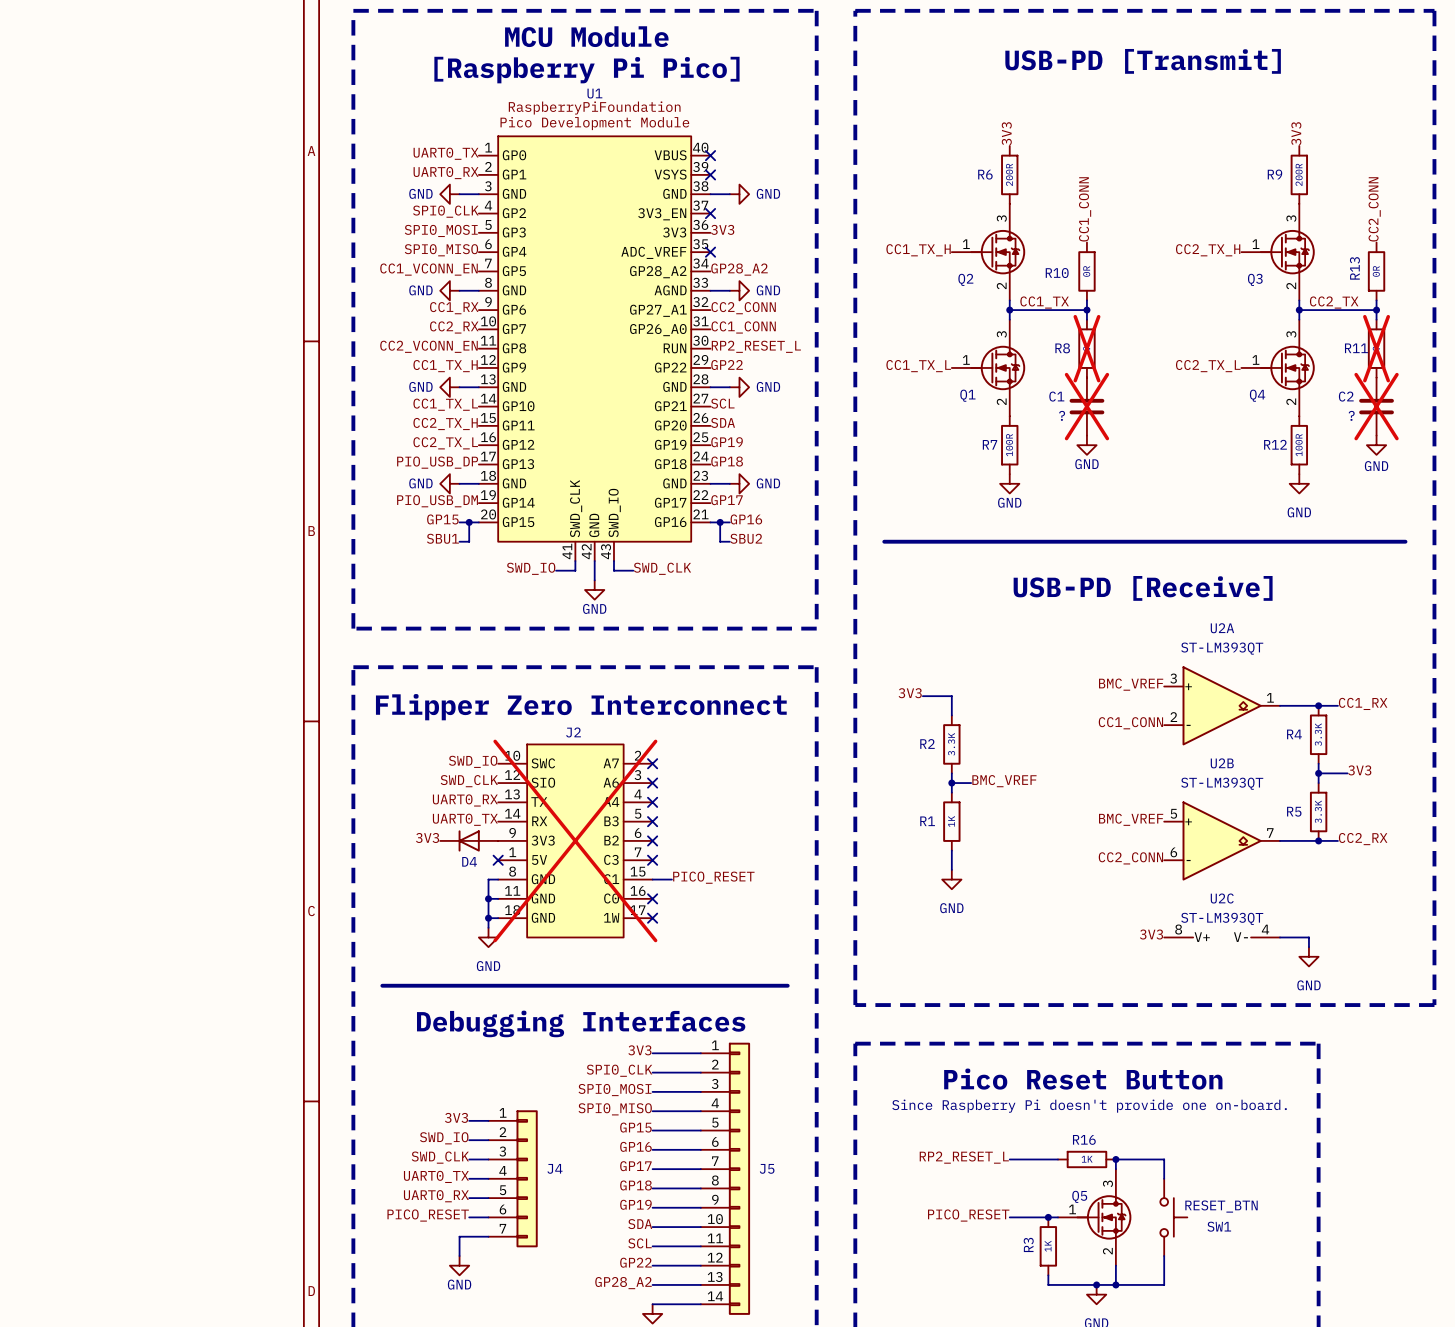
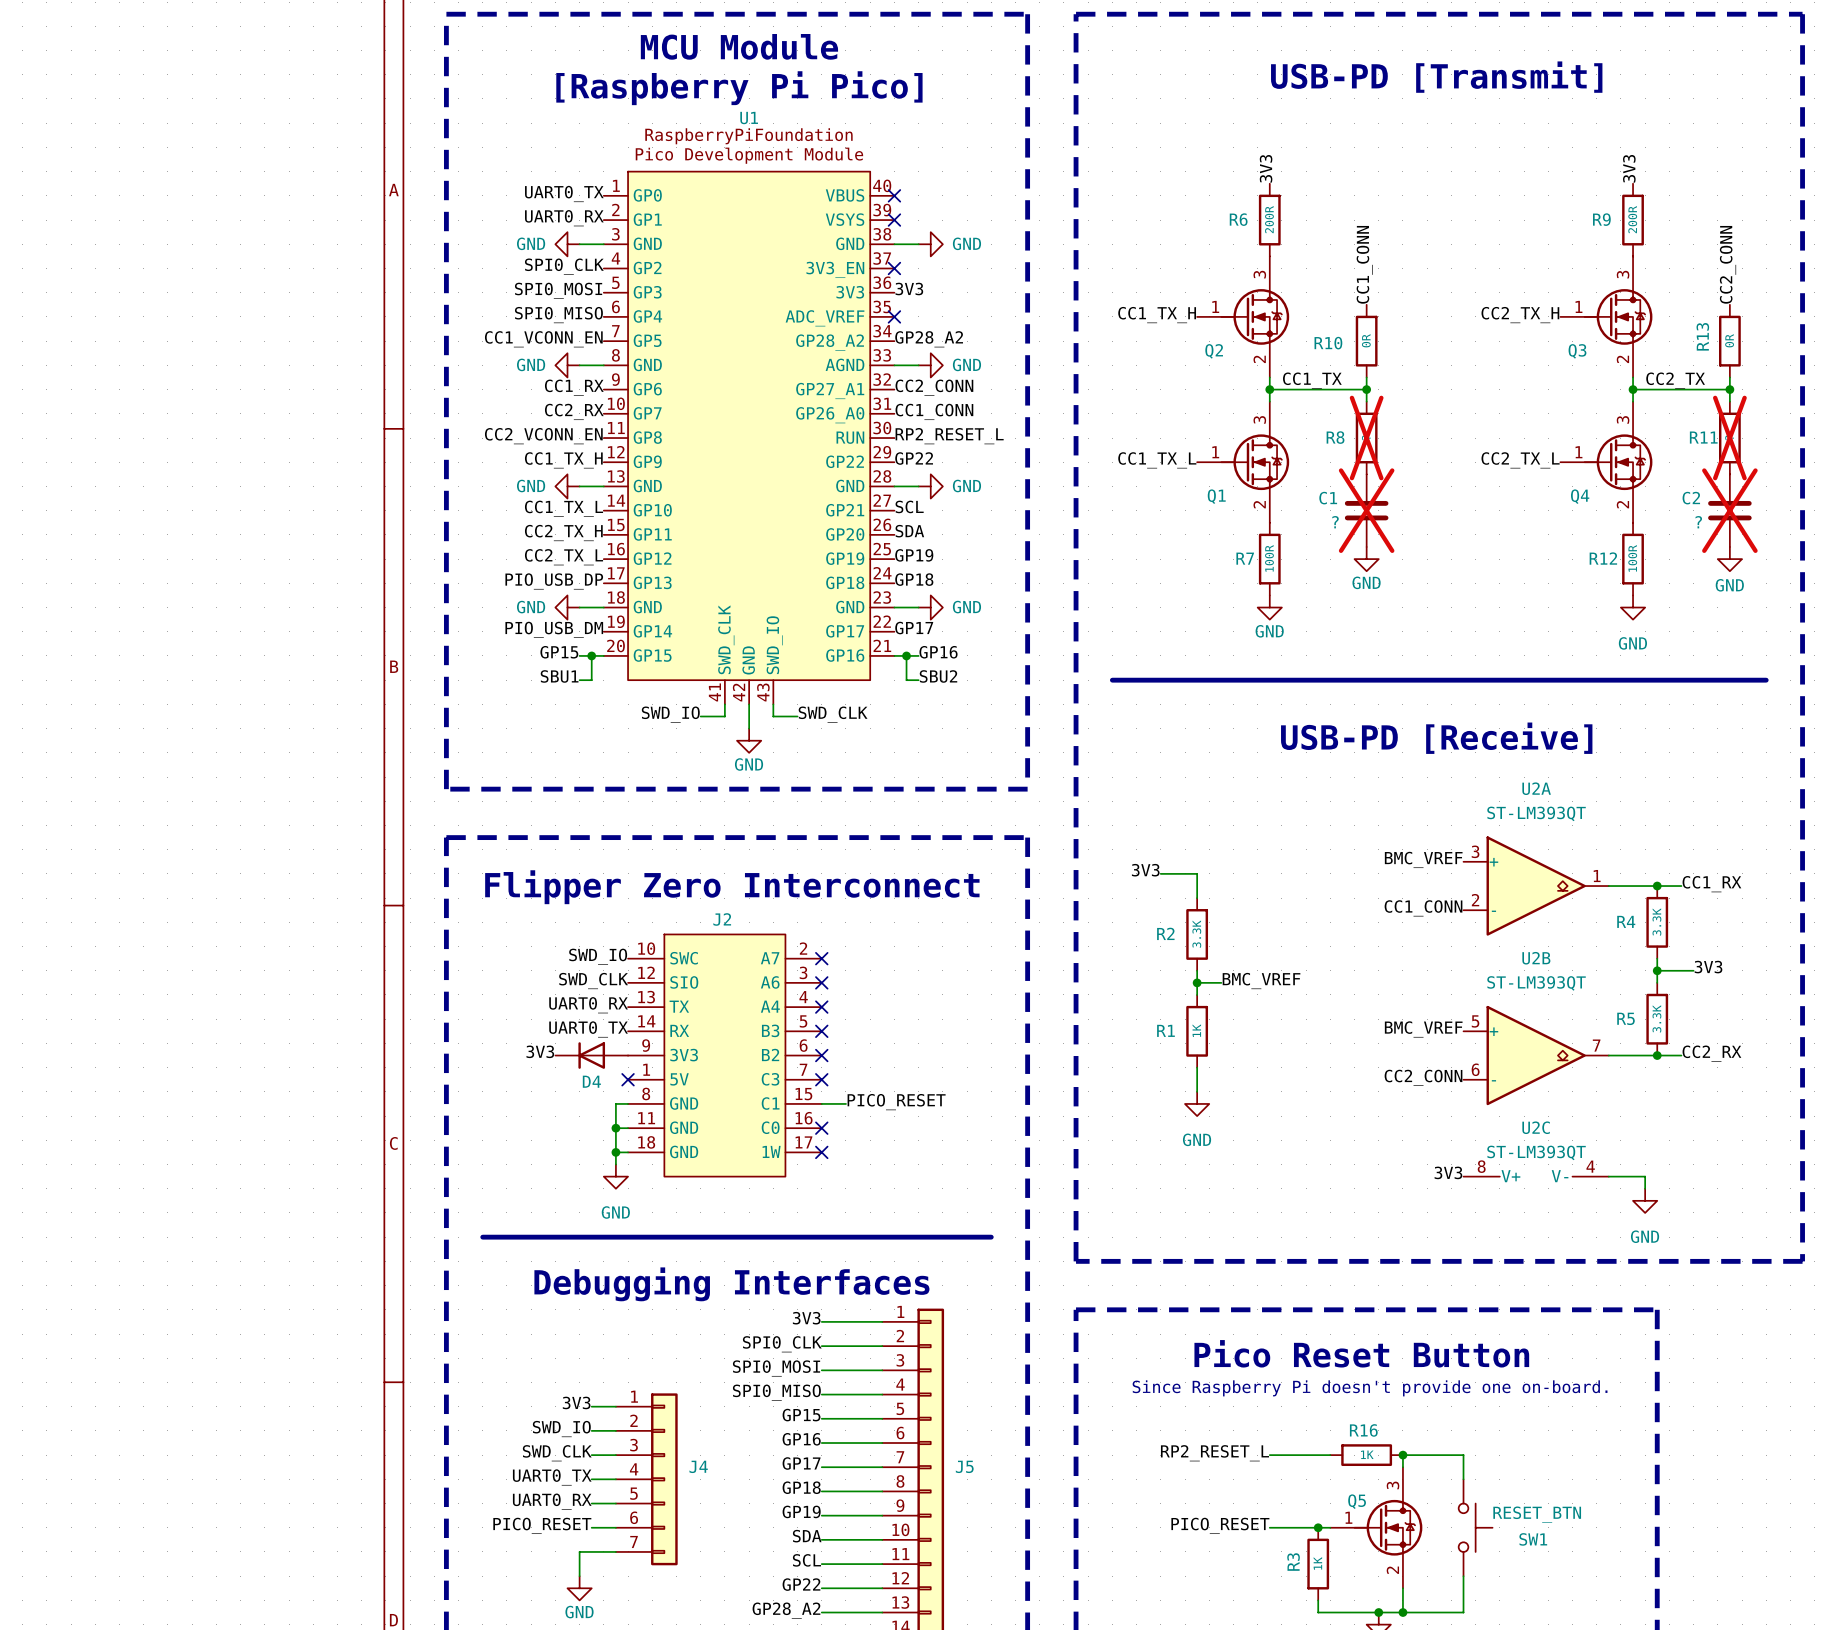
J2 do-not-place cross: (575, 840) -> none

